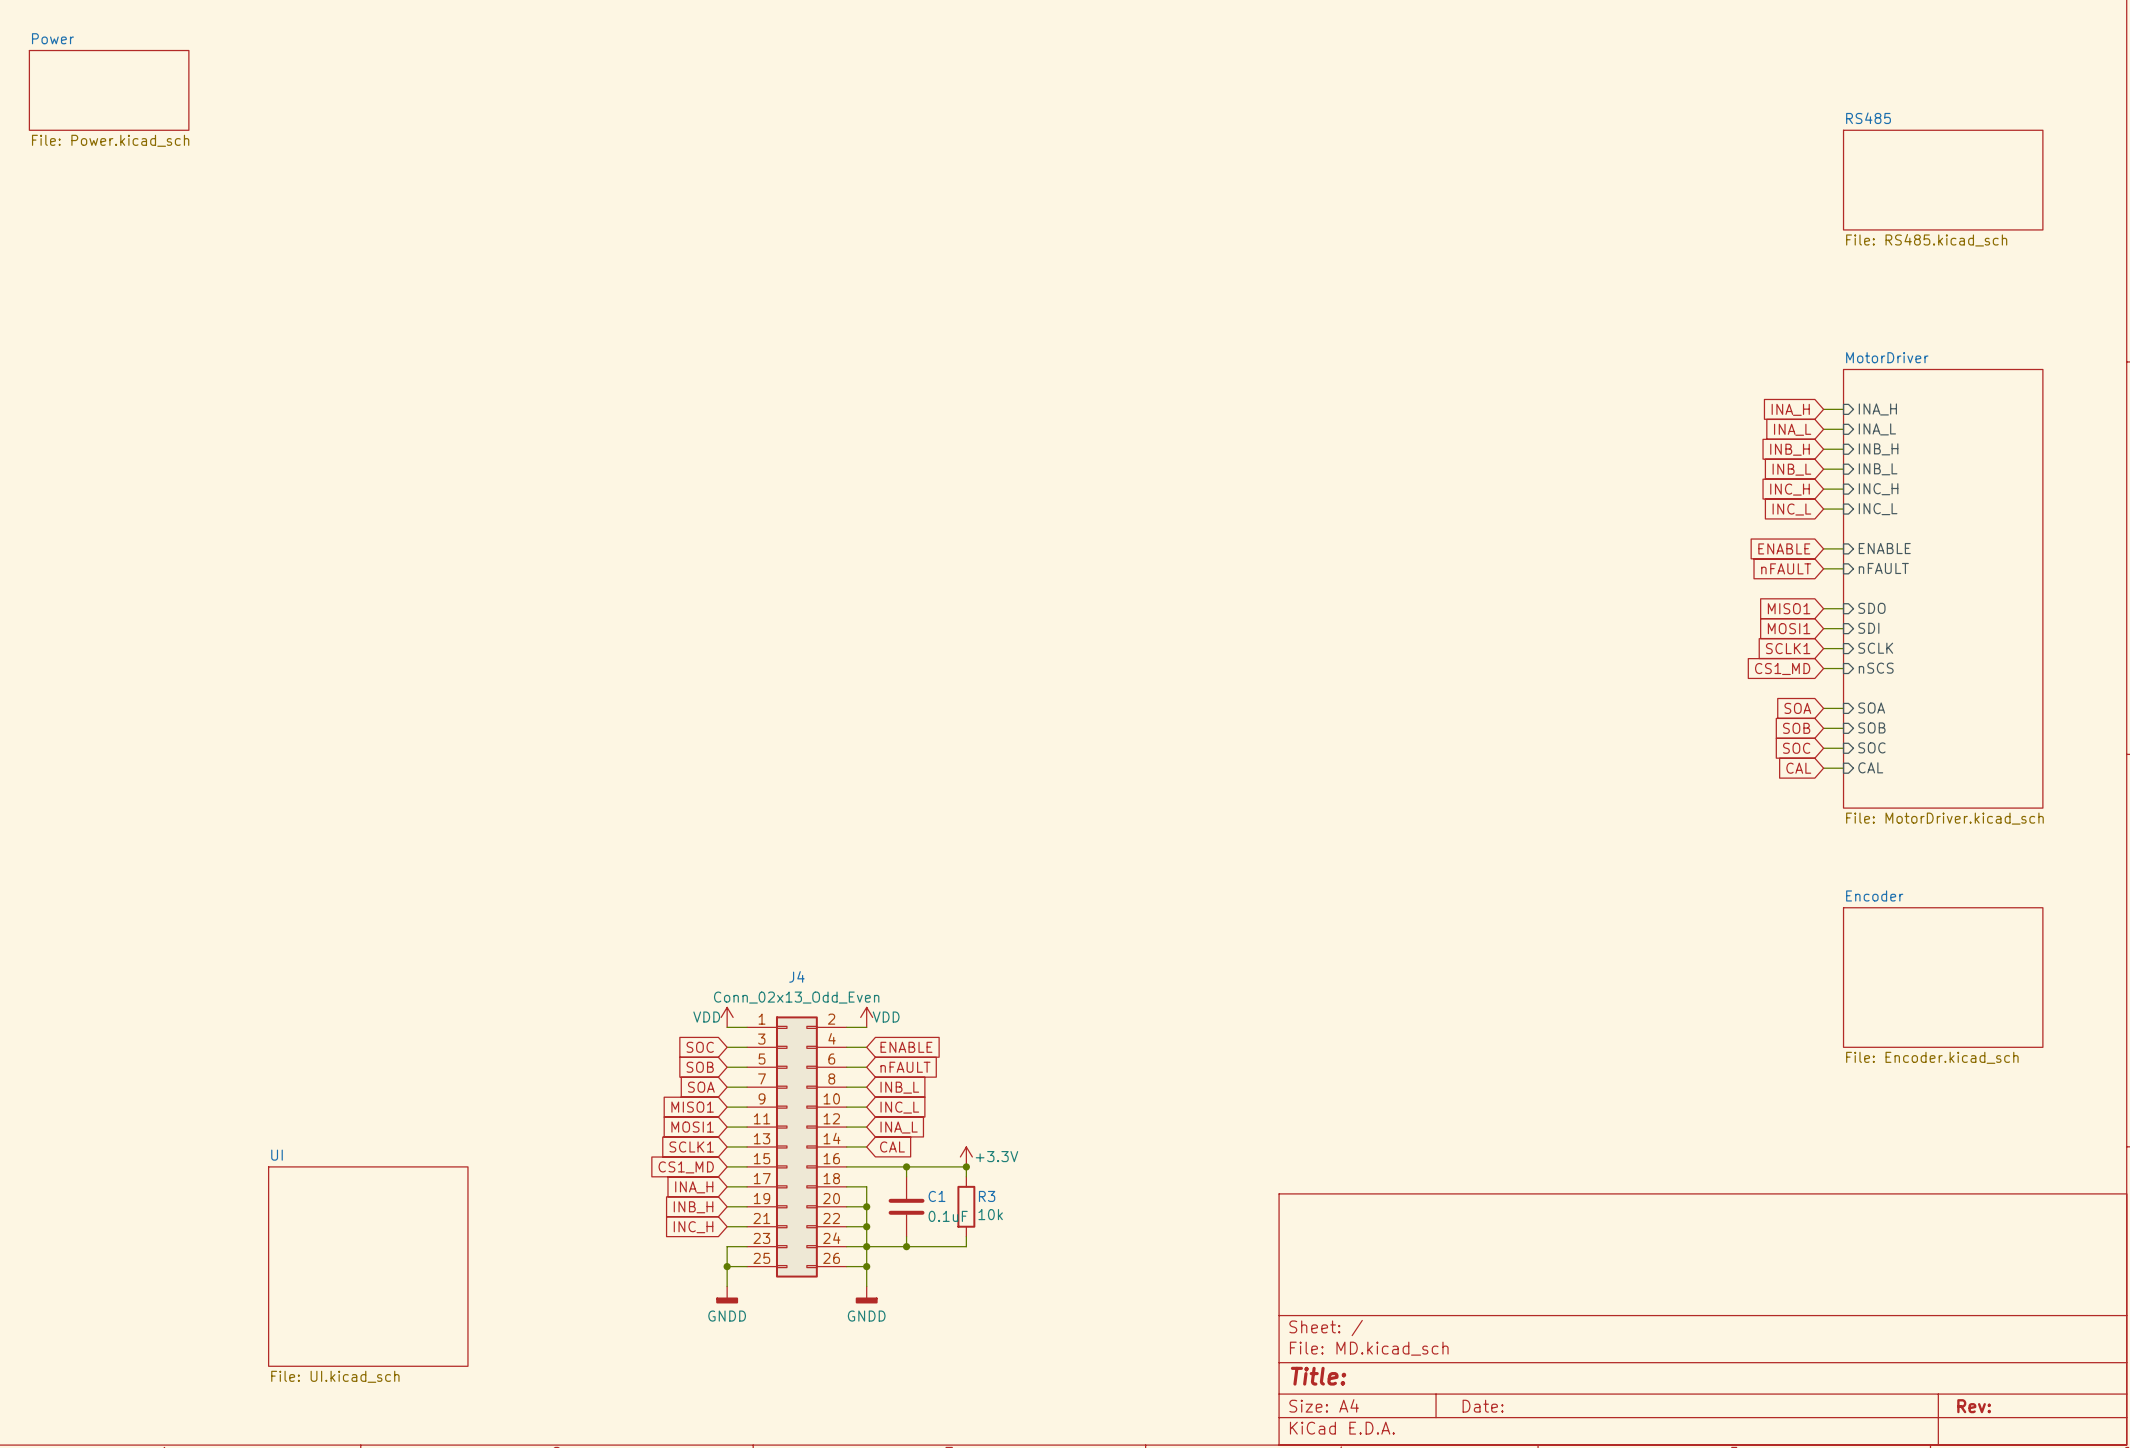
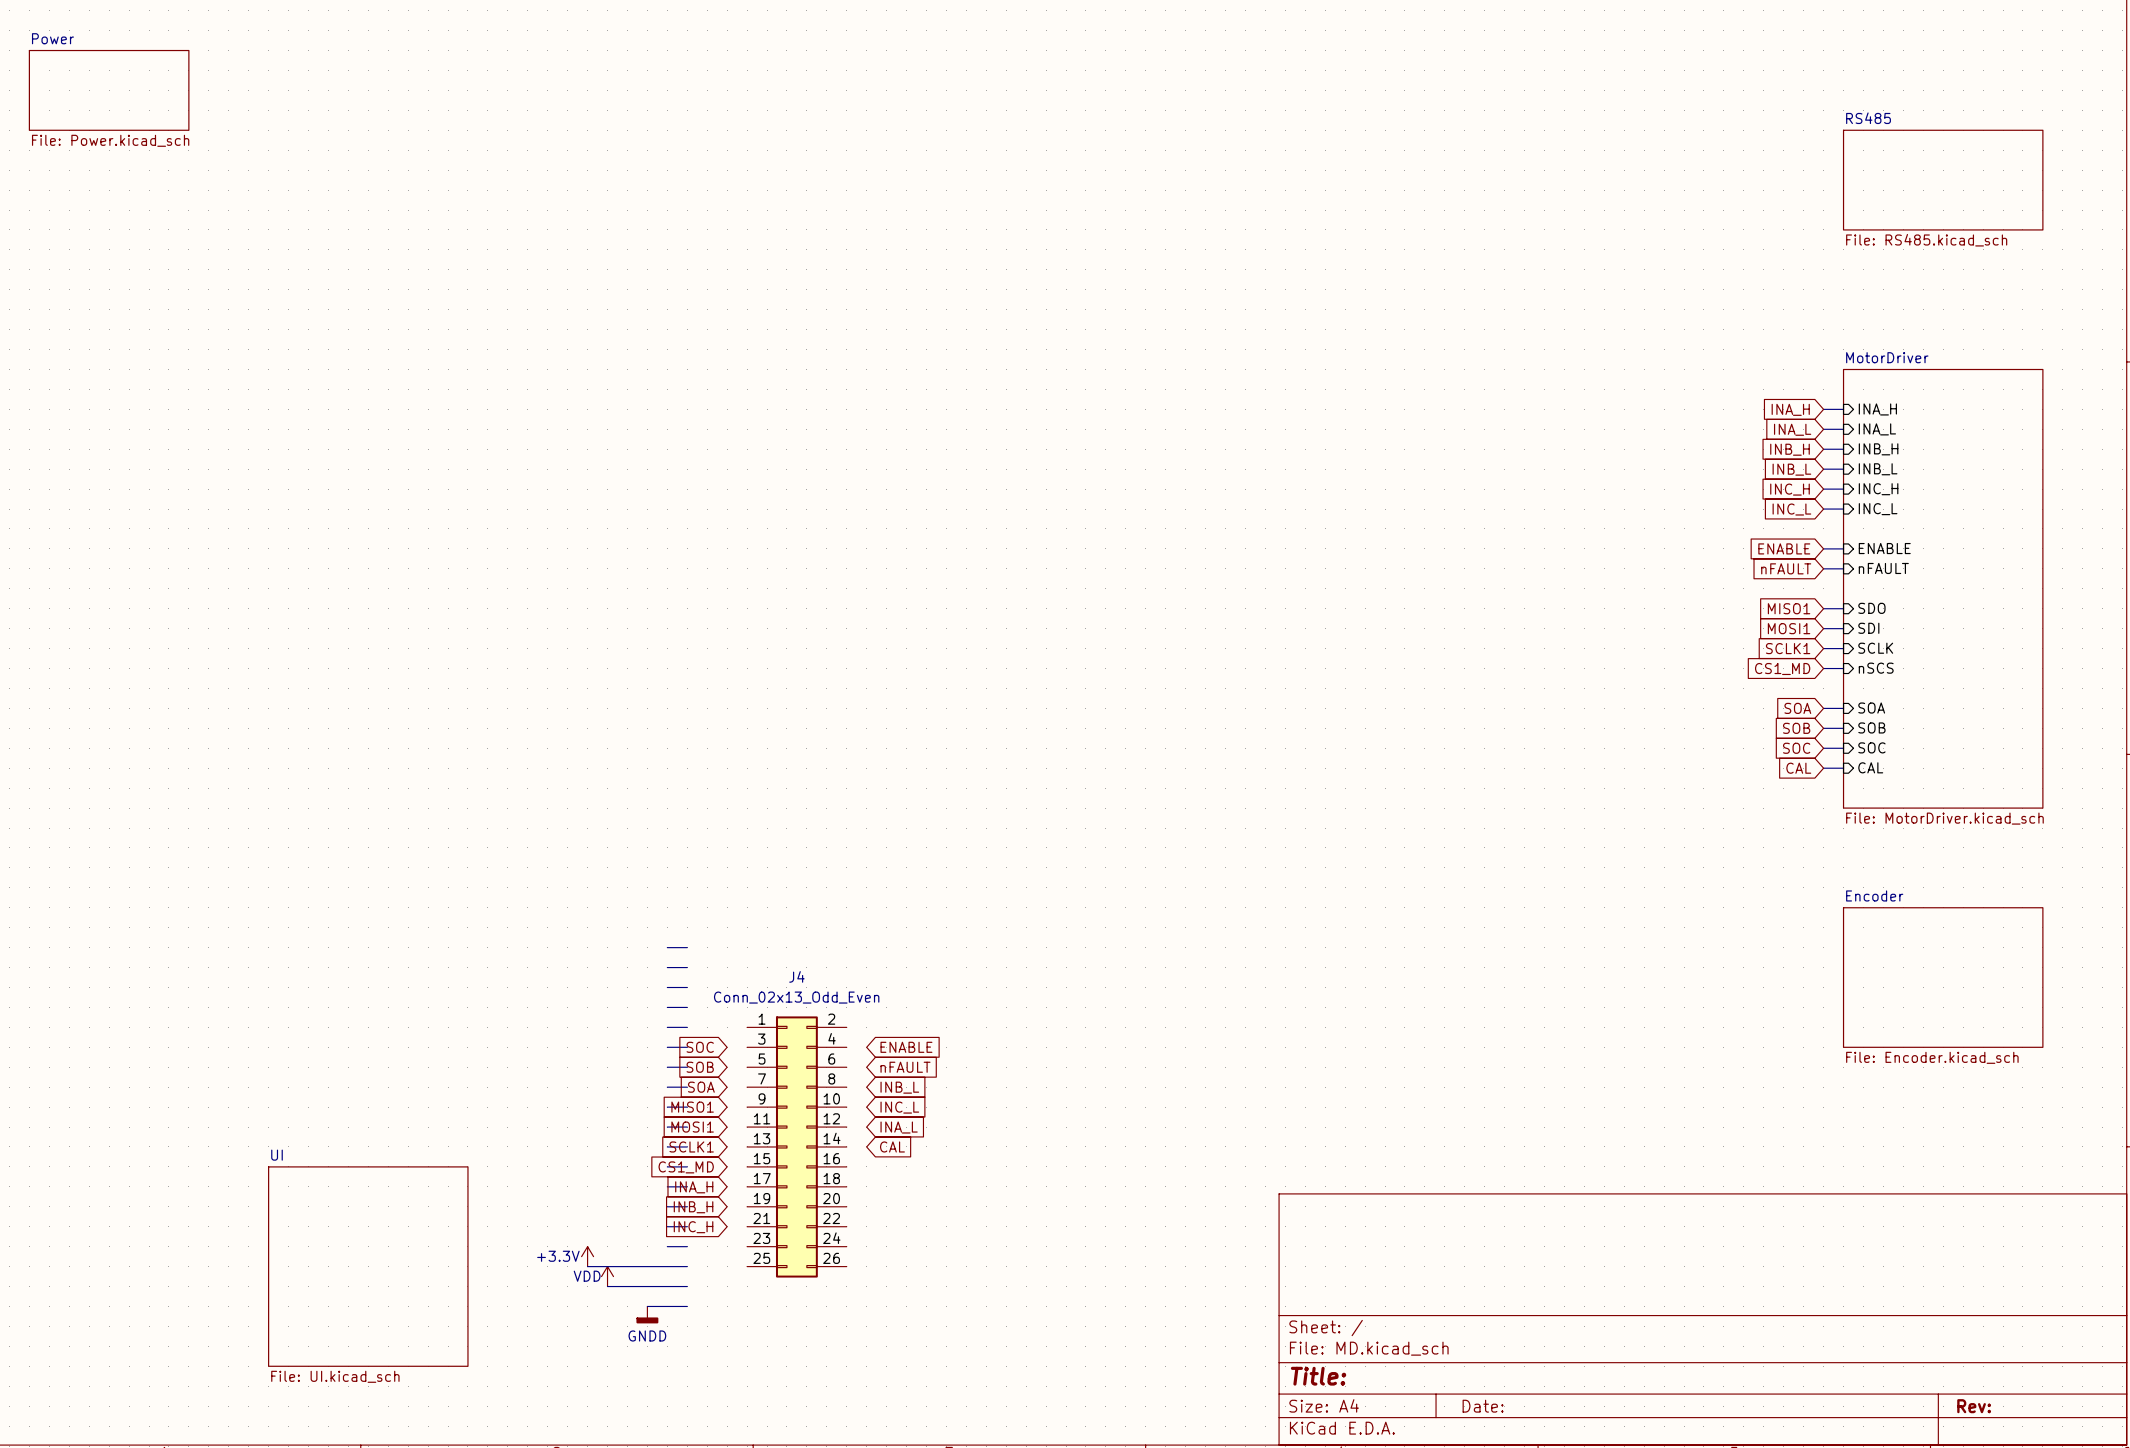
wire: none -> (667, 947) (687, 947)
wire: none -> (667, 967) (687, 967)
power symbol: VDD (727, 1017) -> none
power symbol: VDD (866, 1017) -> none
wire: (727, 1027) (747, 1027) -> (667, 1007) (687, 1007)
wire: (846, 1027) (866, 1027) -> (667, 987) (687, 987)
wire: (727, 1047) (747, 1047) -> (667, 1027) (687, 1027)
wire: (846, 1047) (866, 1047) -> none
wire: (727, 1067) (747, 1067) -> (667, 1047) (687, 1047)
wire: (846, 1067) (866, 1067) -> none
wire: (727, 1087) (747, 1087) -> (667, 1067) (687, 1067)
wire: (846, 1087) (866, 1087) -> none
wire: (727, 1107) (747, 1107) -> (667, 1087) (687, 1087)
wire: (846, 1107) (866, 1107) -> none
wire: (727, 1127) (747, 1127) -> (667, 1107) (687, 1107)
wire: (846, 1127) (866, 1127) -> none
wire: (727, 1146) (747, 1146) -> (667, 1127) (687, 1127)
wire: (846, 1146) (866, 1146) -> none
power symbol: +3.3V (966, 1156) -> none
wire: (727, 1166) (747, 1166) -> (667, 1146) (687, 1146)
wire: (846, 1166) (966, 1166) (966, 1176) -> none
wire: (906, 1166) (906, 1176) -> none
junction: (906, 1166) -> none
junction: (966, 1166) -> none
wire: (727, 1186) (747, 1186) -> (667, 1166) (687, 1166)
wire: (846, 1186) (866, 1186) (866, 1286) -> none
wire: (727, 1206) (747, 1206) -> (667, 1186) (687, 1186)
wire: (846, 1206) (866, 1206) -> none
junction: (866, 1206) -> none
C1: 0.1uF (906, 1206) -> none
R3: 10k (966, 1206) -> none
wire: (727, 1226) (747, 1226) -> (667, 1206) (687, 1206)
wire: (846, 1226) (866, 1226) -> none
junction: (866, 1226) -> none
wire: (906, 1236) (906, 1246) -> none
wire: (966, 1236) (966, 1246) (846, 1246) -> none
wire: (747, 1246) (727, 1246) (727, 1286) -> none
junction: (866, 1246) -> none
junction: (906, 1246) -> none
power symbol: none -> +3.3V (587, 1256)
wire: none -> (587, 1266) (687, 1266)
wire: (727, 1266) (747, 1266) -> (667, 1246) (687, 1246)
junction: (727, 1266) -> none
wire: (846, 1266) (866, 1266) -> (667, 1226) (687, 1226)
junction: (866, 1266) -> none
power symbol: none -> VDD (607, 1276)
wire: none -> (607, 1286) (687, 1286)
power symbol position: GNDD (727, 1295) -> GNDD (647, 1314)
power symbol: GNDD (866, 1295) -> none
wire: none -> (647, 1306) (687, 1306)

